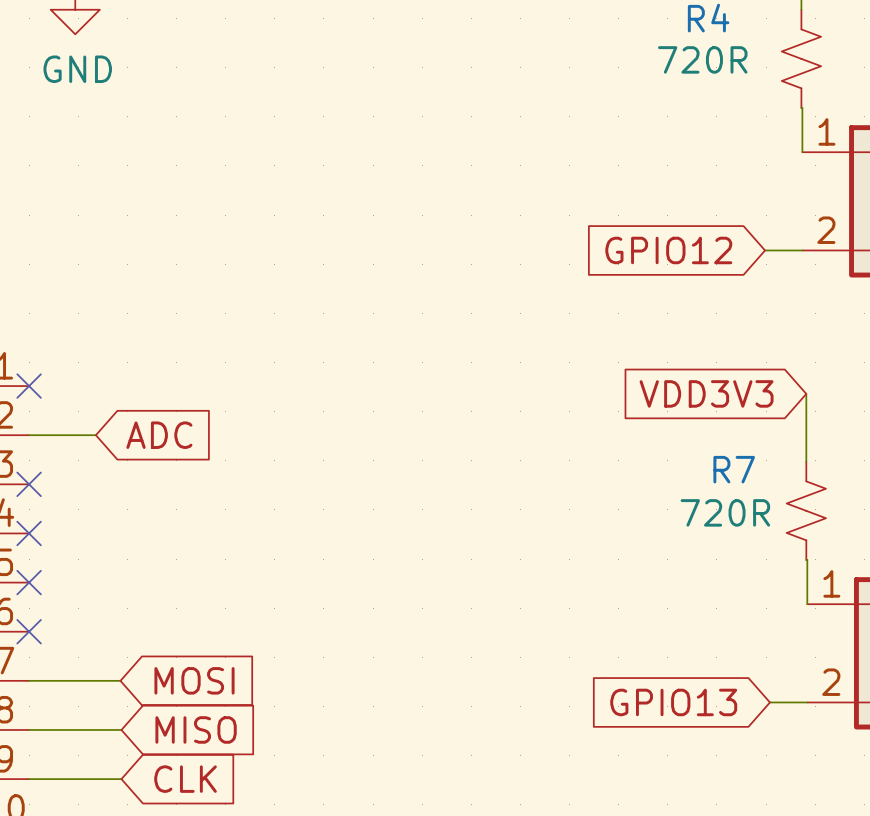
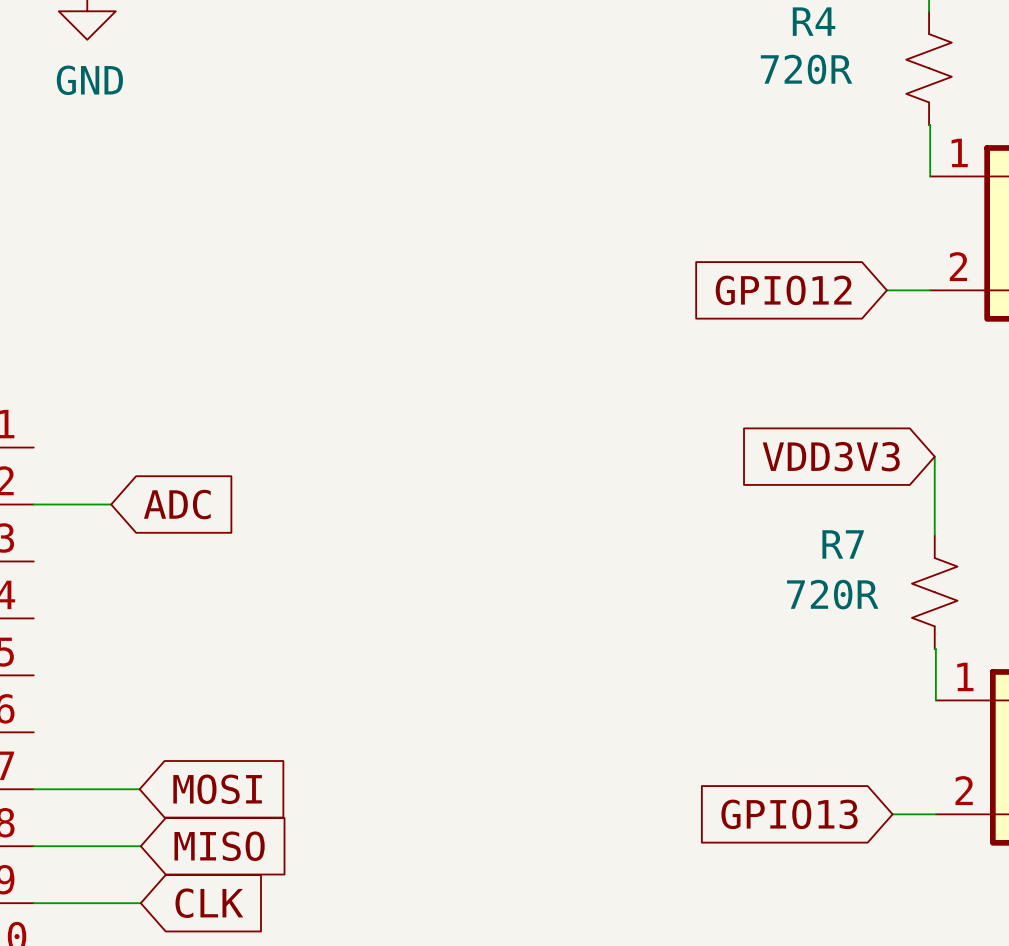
no-connect mark: (29, 386) -> none
no-connect mark: (29, 484) -> none
no-connect mark: (29, 533) -> none
no-connect mark: (29, 582) -> none
no-connect mark: (29, 631) -> none

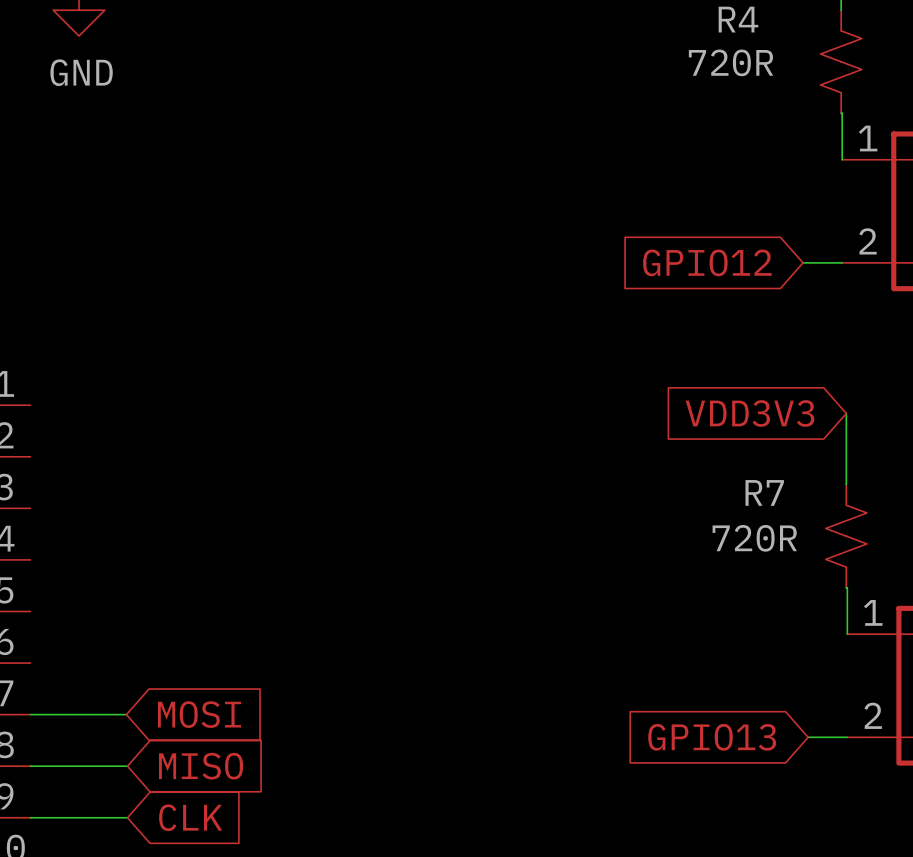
wire: (33, 504) (111, 504) -> none
global label: ADC (177, 504) -> none

